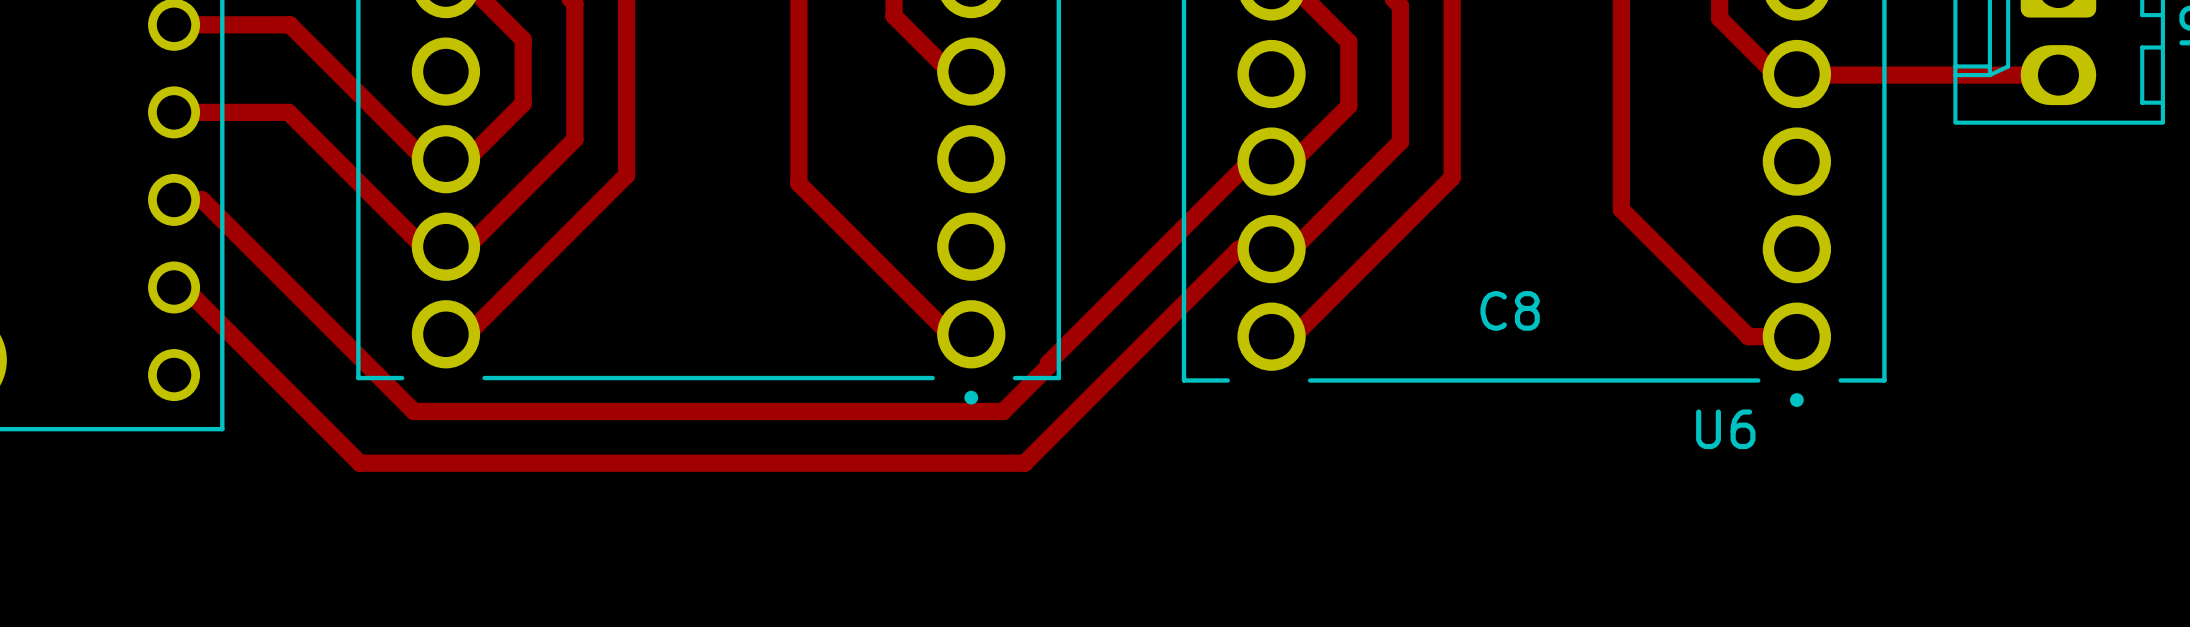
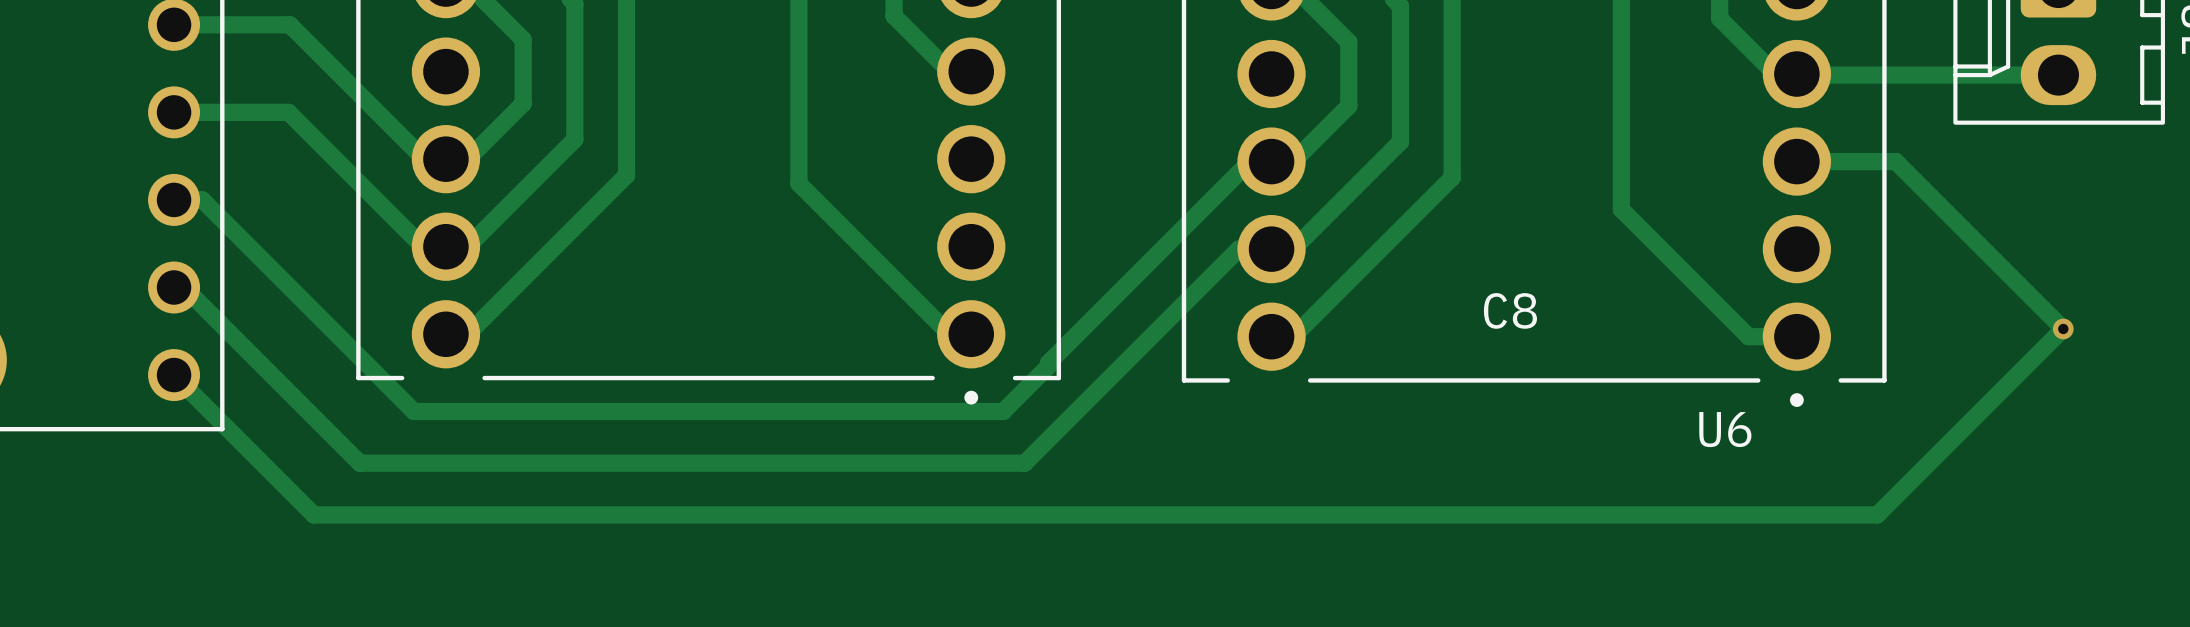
track: none -> (1796, 161) (1895, 161) (2063, 328) (1877, 514) (313, 514) (174, 375)
via: none -> (2063, 328)

